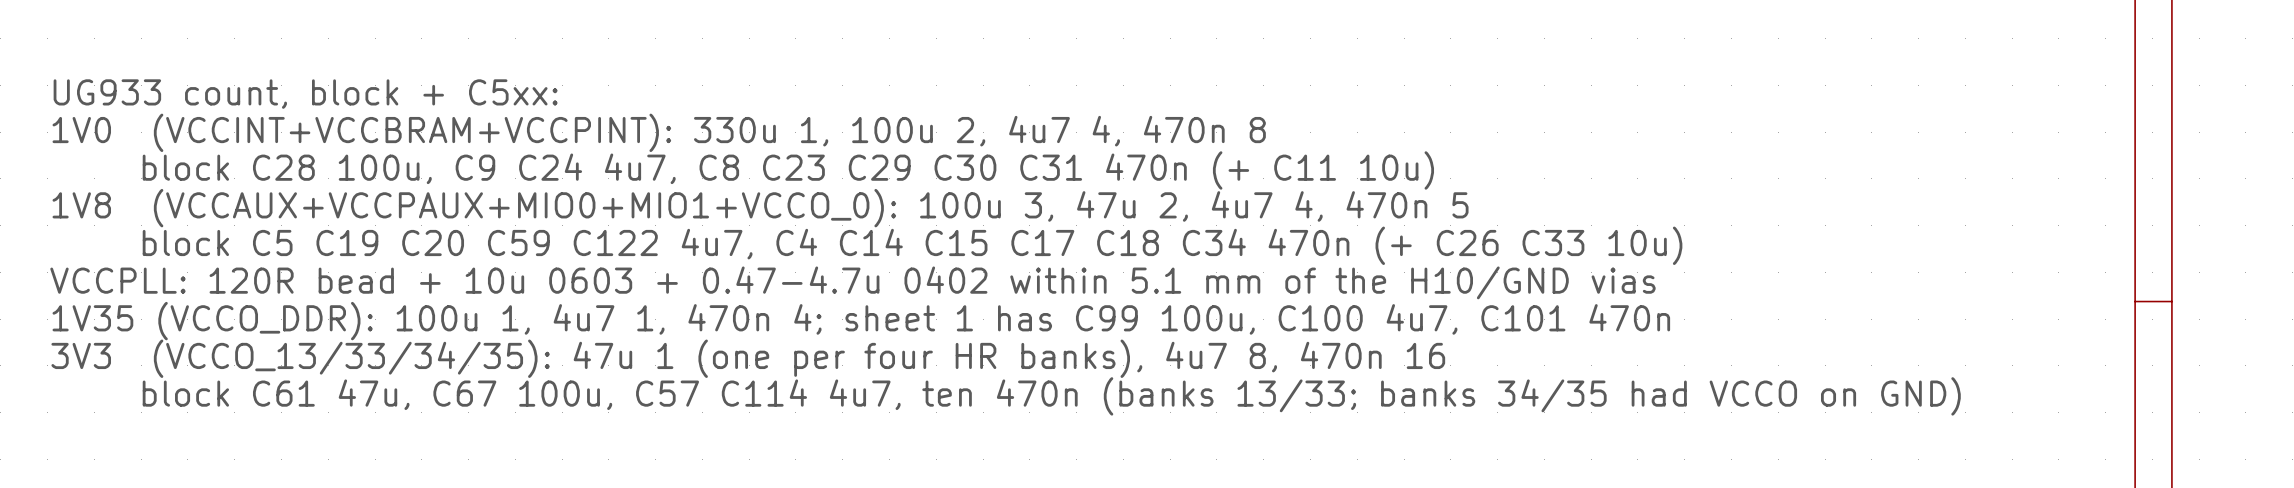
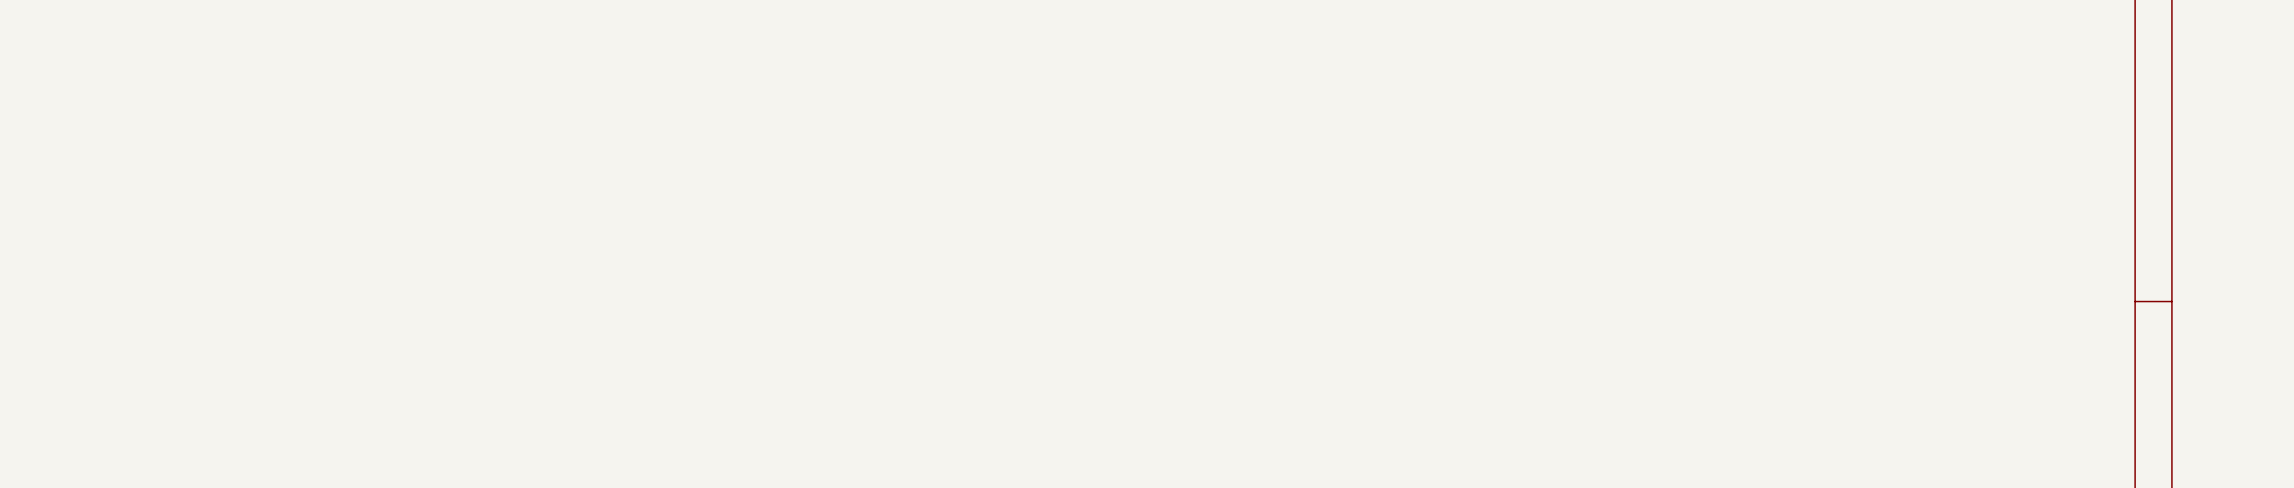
text: UG933 count, block + C5xx: (305, 94) -> none
text: 1V0 (VCCINT+VCCBRAM+VCCPINT): 330u 1, 100u 2, 4u7 4, 470n 8 (659, 132) -> none
text: block C28 100u, C9 C24 4u7, C8 C23 C29 C30 C31 470n (+ C11 10u) (788, 170) -> none
text: 1V8 (VCCAUX+VCCPAUX+MIO0+MIO1+VCCO_0): 100u 3, 47u 2, 4u7 4, 470n 5 (760, 208) -> none
text: block C5 C19 C20 C59 C122 4u7, C4 C14 C15 C17 C18 C34 470n (+ C26 C33 10u) (912, 245) -> none
text: VCCPLL: 120R bead + 10u 0603 + 0.47-4.7u 0402 within 5.1 mm of the H10/GND vias (852, 282) -> none
text: 1V35 (VCCO_DDR): 100u 1, 4u7 1, 470n 4; sheet 1 has C99 100u, C100 4u7, C101 470n (861, 321) -> none
text: 3V3 (VCCO_13/33/34/35): 47u 1 (one per four HR banks), 4u7 8, 470n 16 (748, 358) -> none
text: block C61 47u, C67 100u, C57 C114 4u7, ten 470n (banks 13/33; banks 34/35 had VCCO on GND) (1051, 396) -> none

